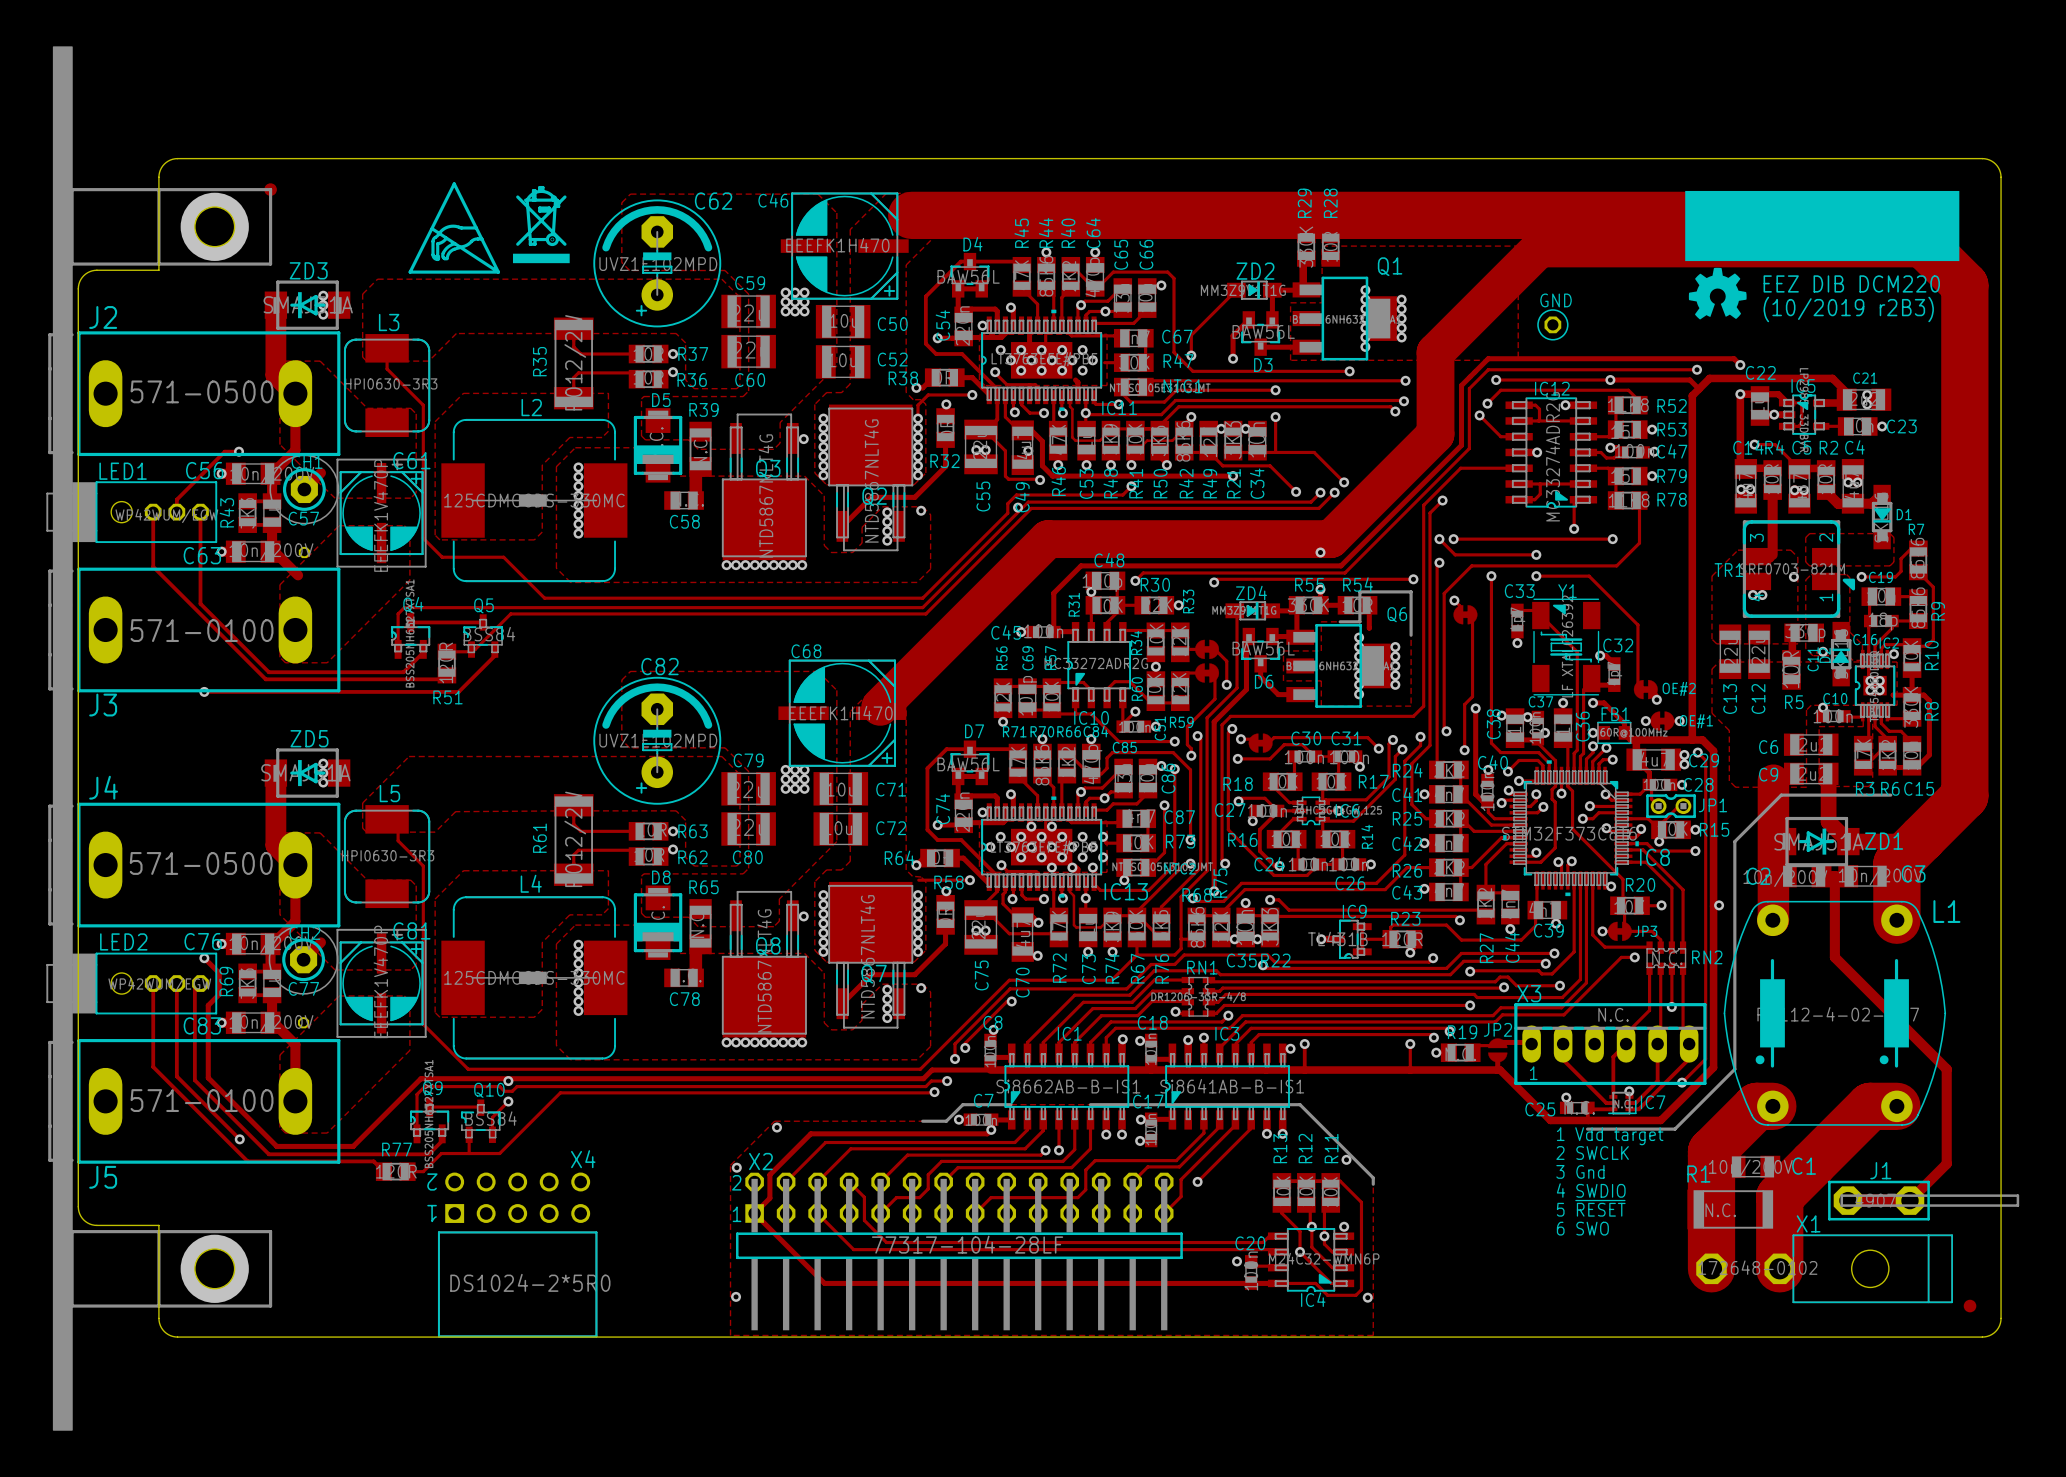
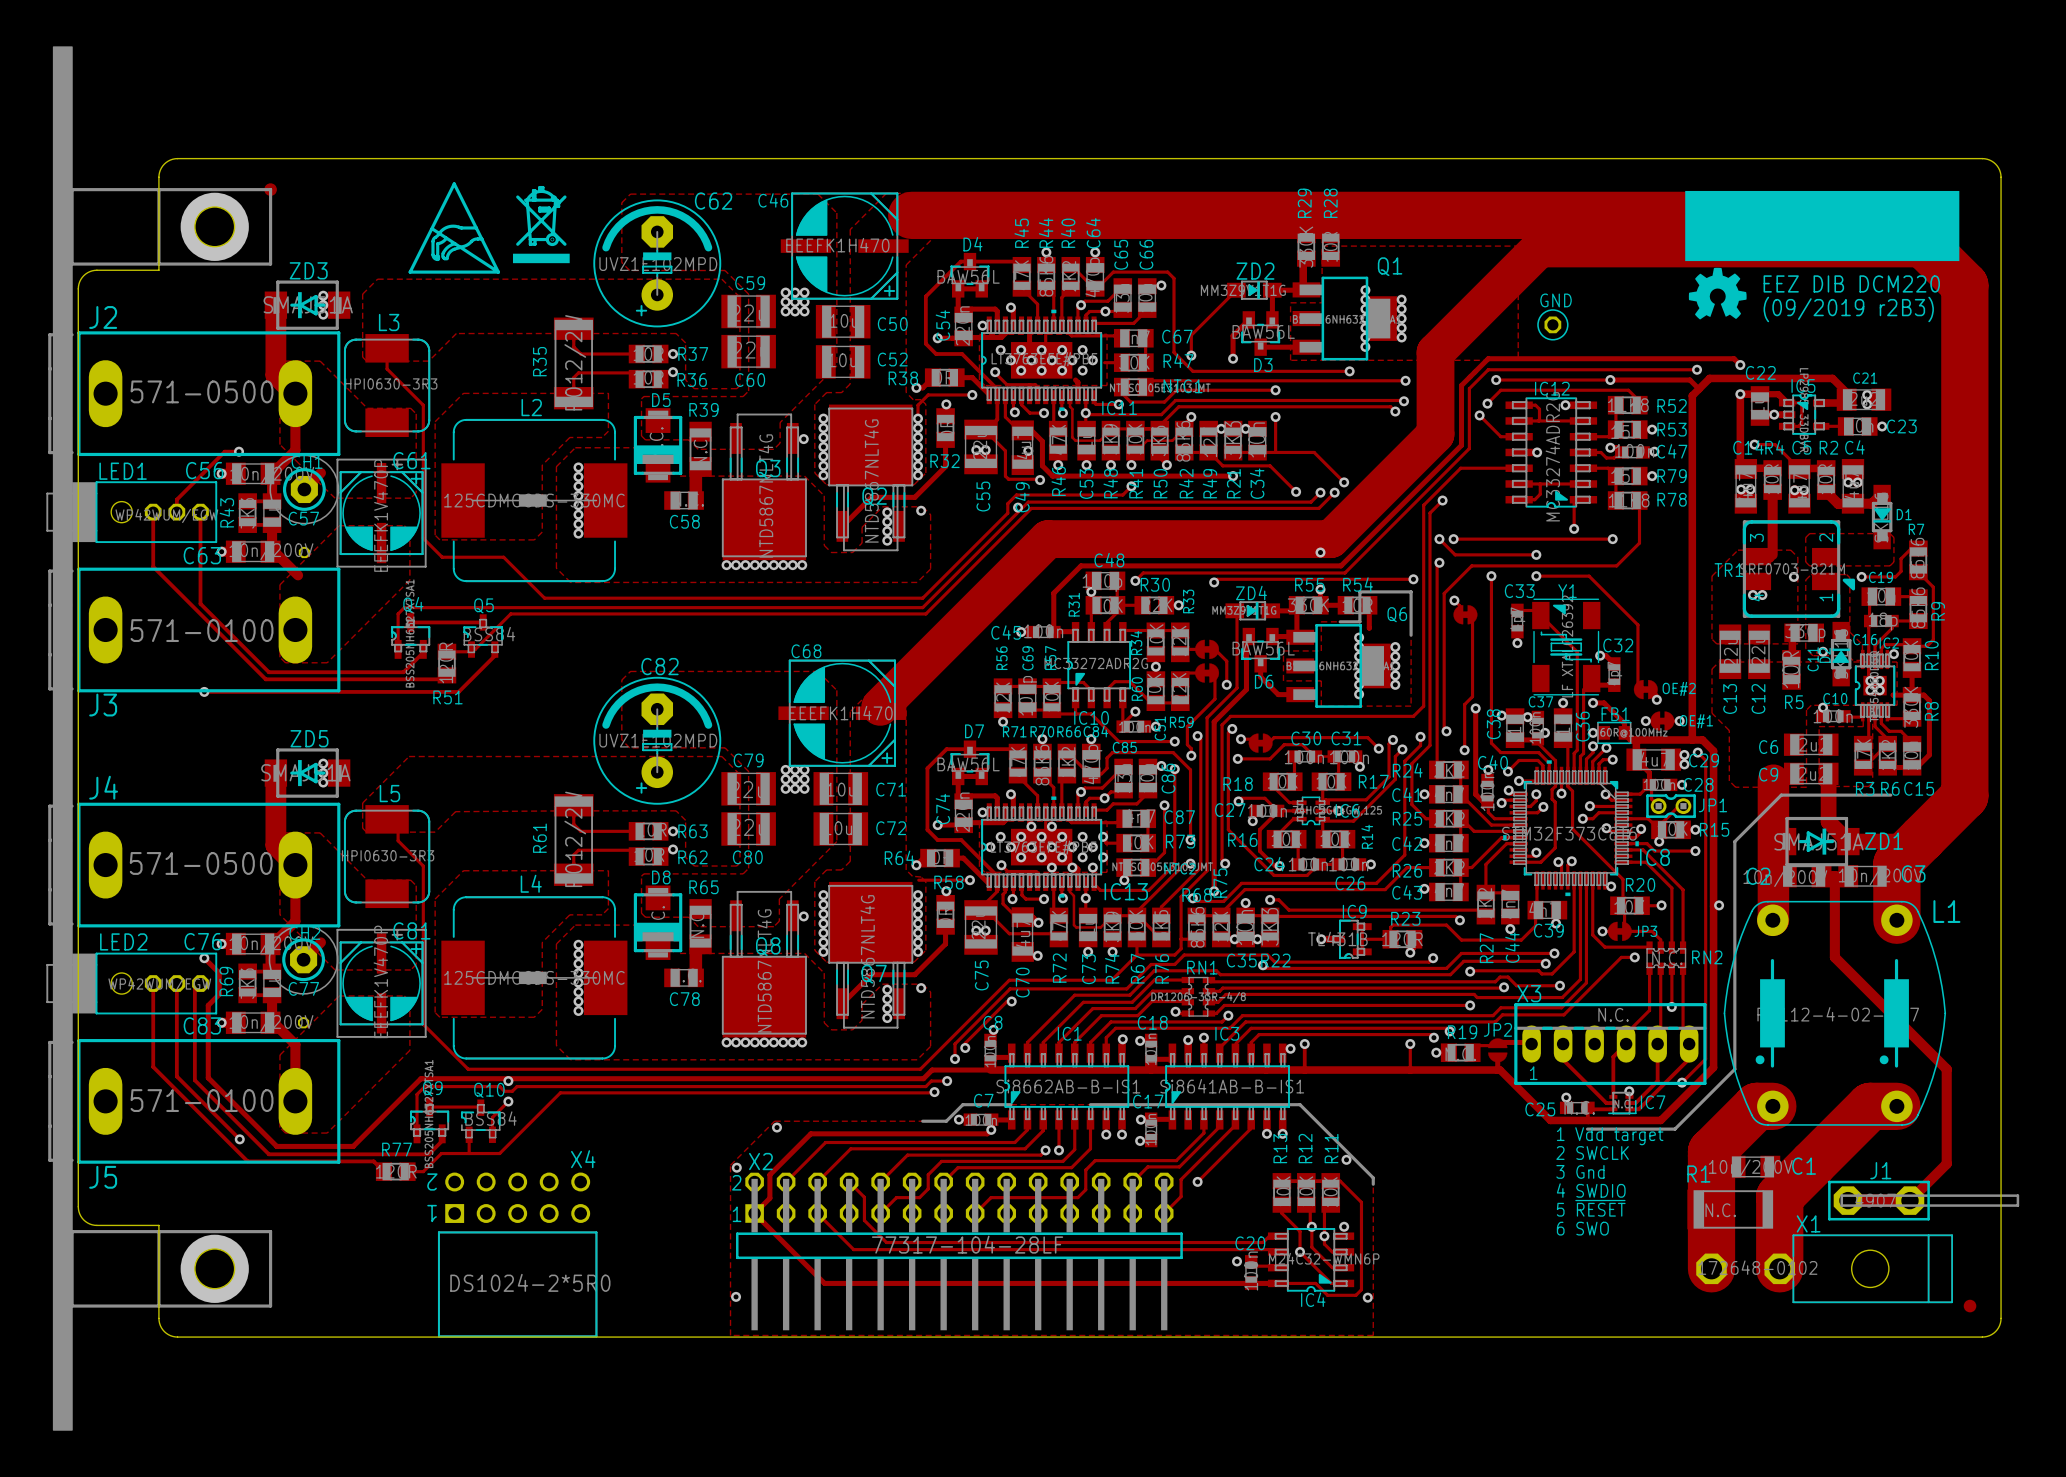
text: (10/2019 r2B3) (1848, 309) -> (09/2019 r2B3) (1848, 309)

